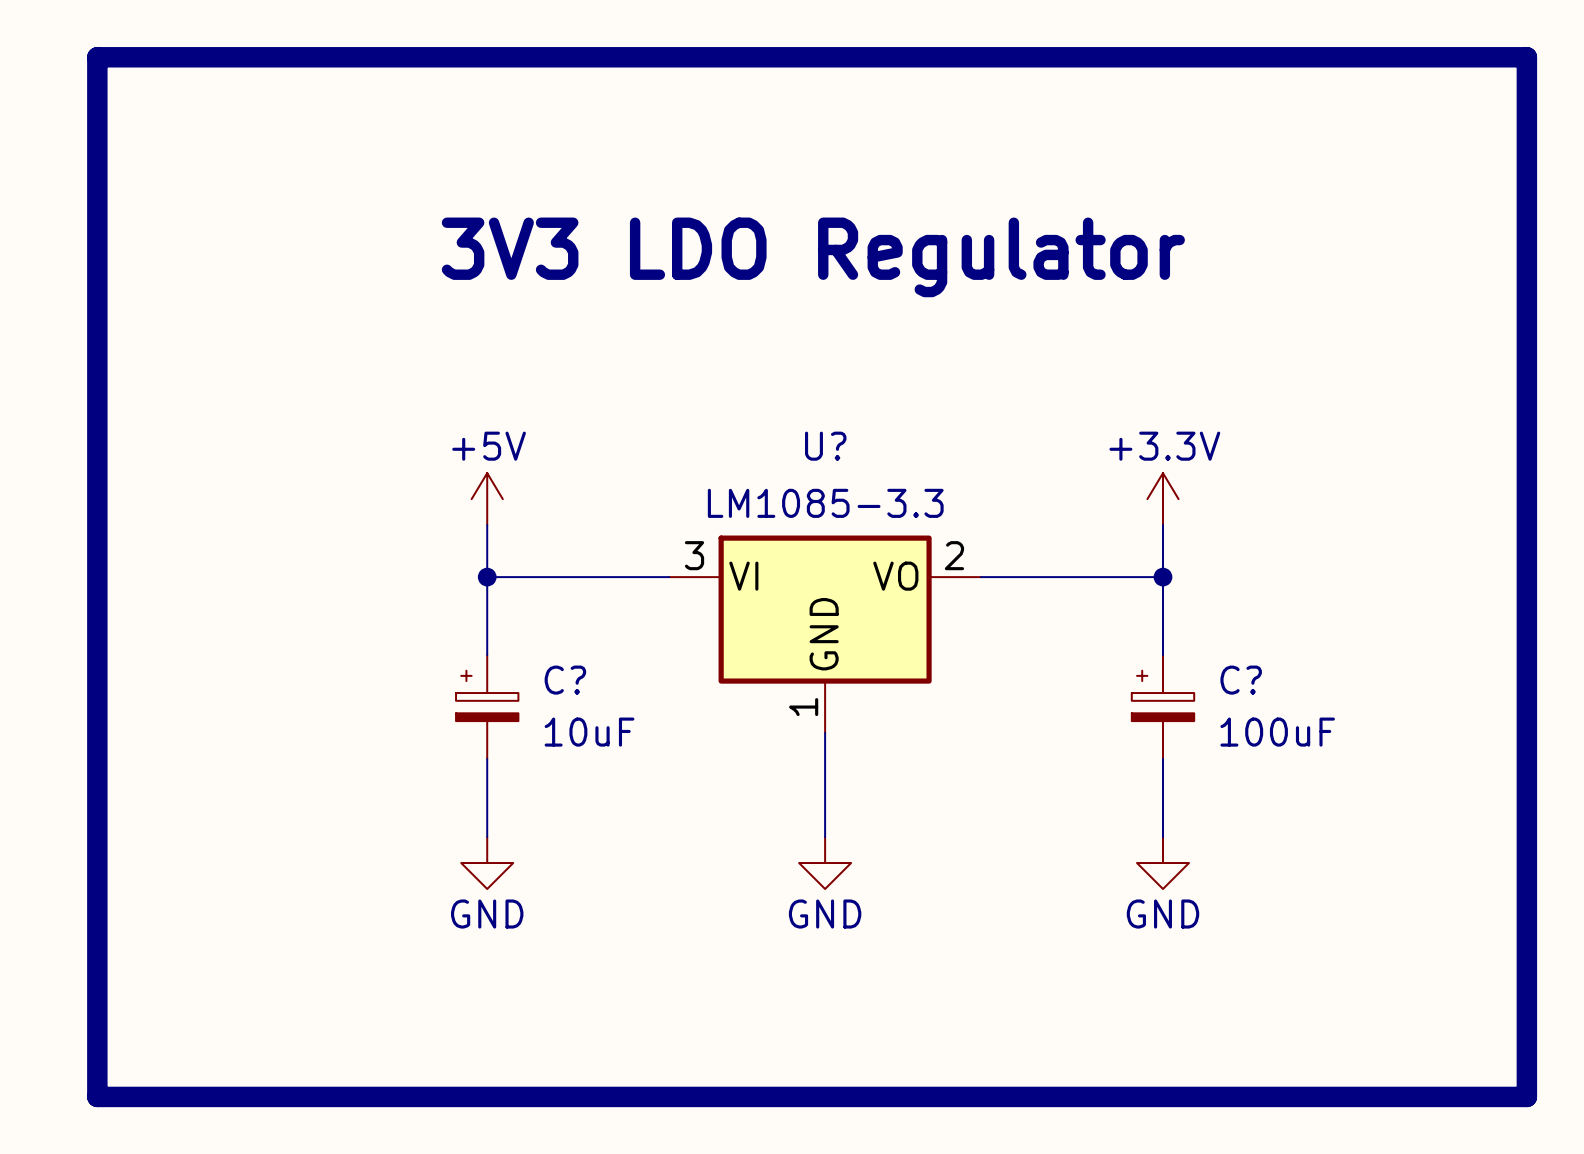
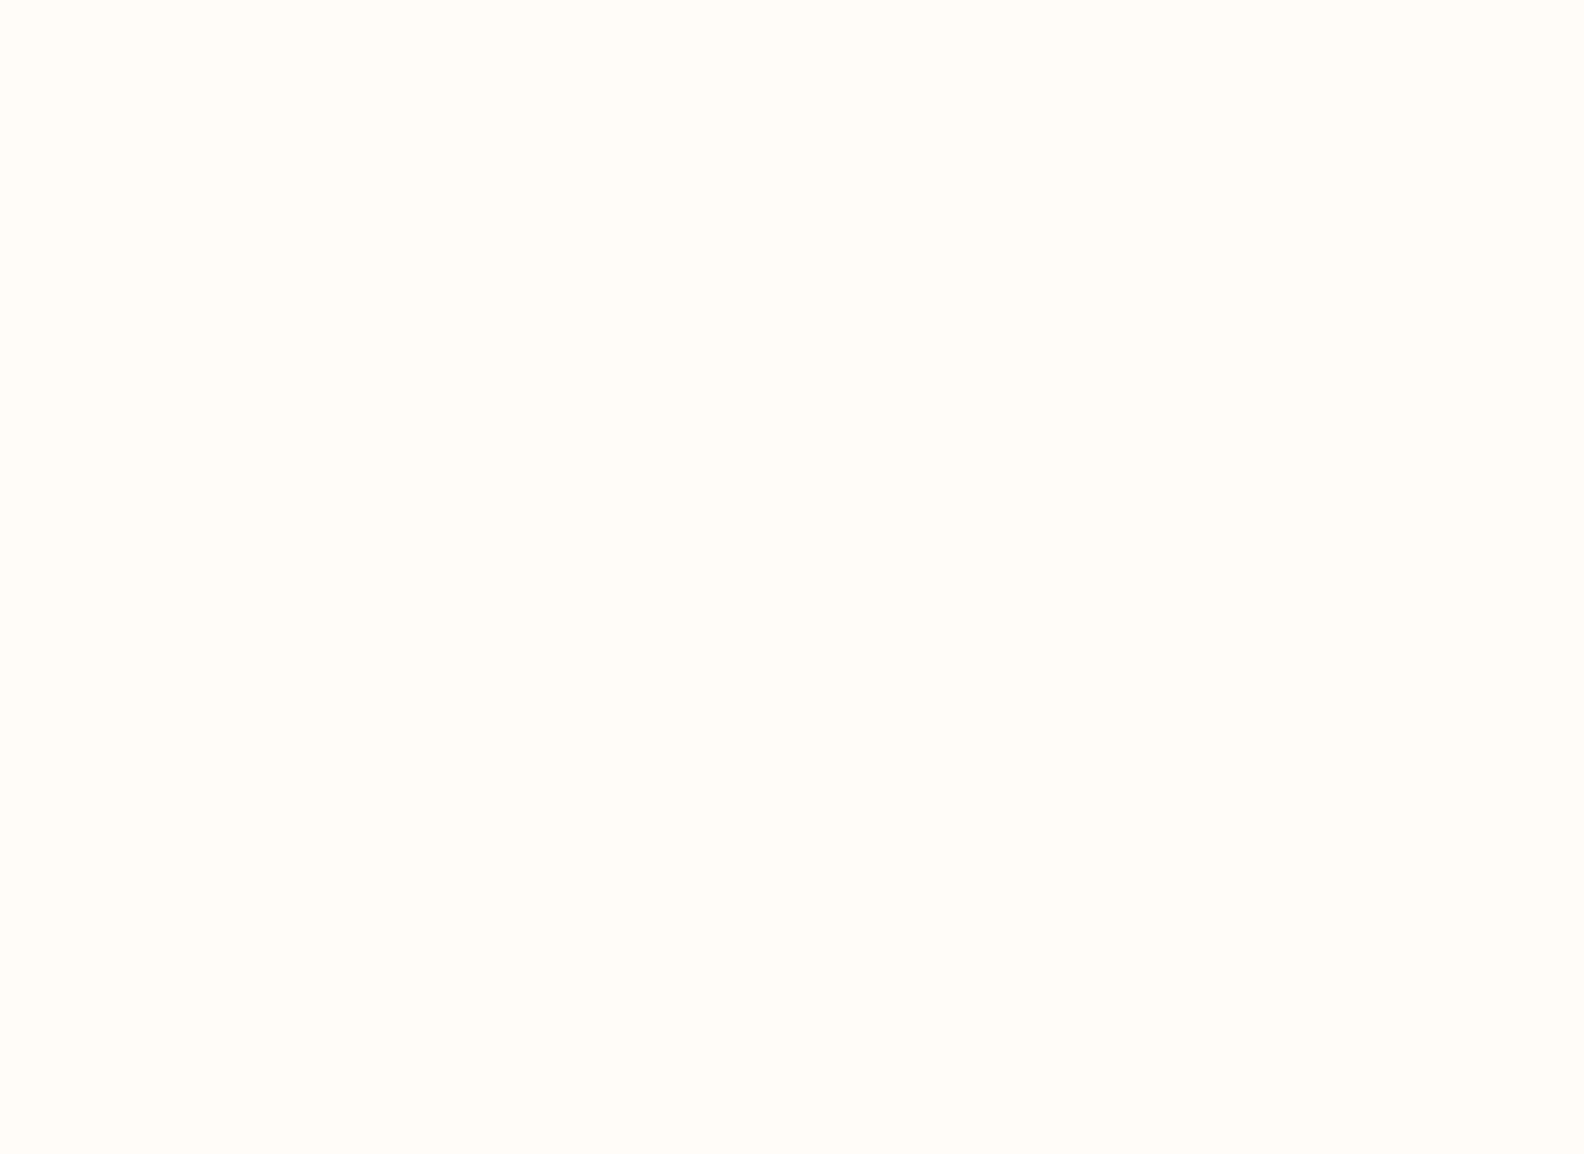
line: (97, 57) (1526, 57) (1526, 1096) (97, 1096) (97, 57) -> none
text: 3V3 LDO Regulator (813, 257) -> none
power symbol: +5V (487, 499) -> none
power symbol: +3.3V (1163, 499) -> none
wire: (487, 525) (487, 655) -> none
wire: (1163, 525) (1163, 655) -> none
wire: (487, 577) (669, 577) -> none
junction: (487, 577) -> none
wire: (981, 577) (1163, 577) -> none
junction: (1163, 577) -> none
U?: (825, 634) -> none
C?: 10uF (487, 707) -> none
C?: 100uF (1163, 707) -> none
wire: (825, 733) (825, 837) -> none
wire: (487, 759) (487, 837) -> none
wire: (1163, 759) (1163, 837) -> none
power symbol: GND (487, 863) -> none
power symbol: GND (825, 863) -> none
power symbol: GND (1163, 863) -> none

